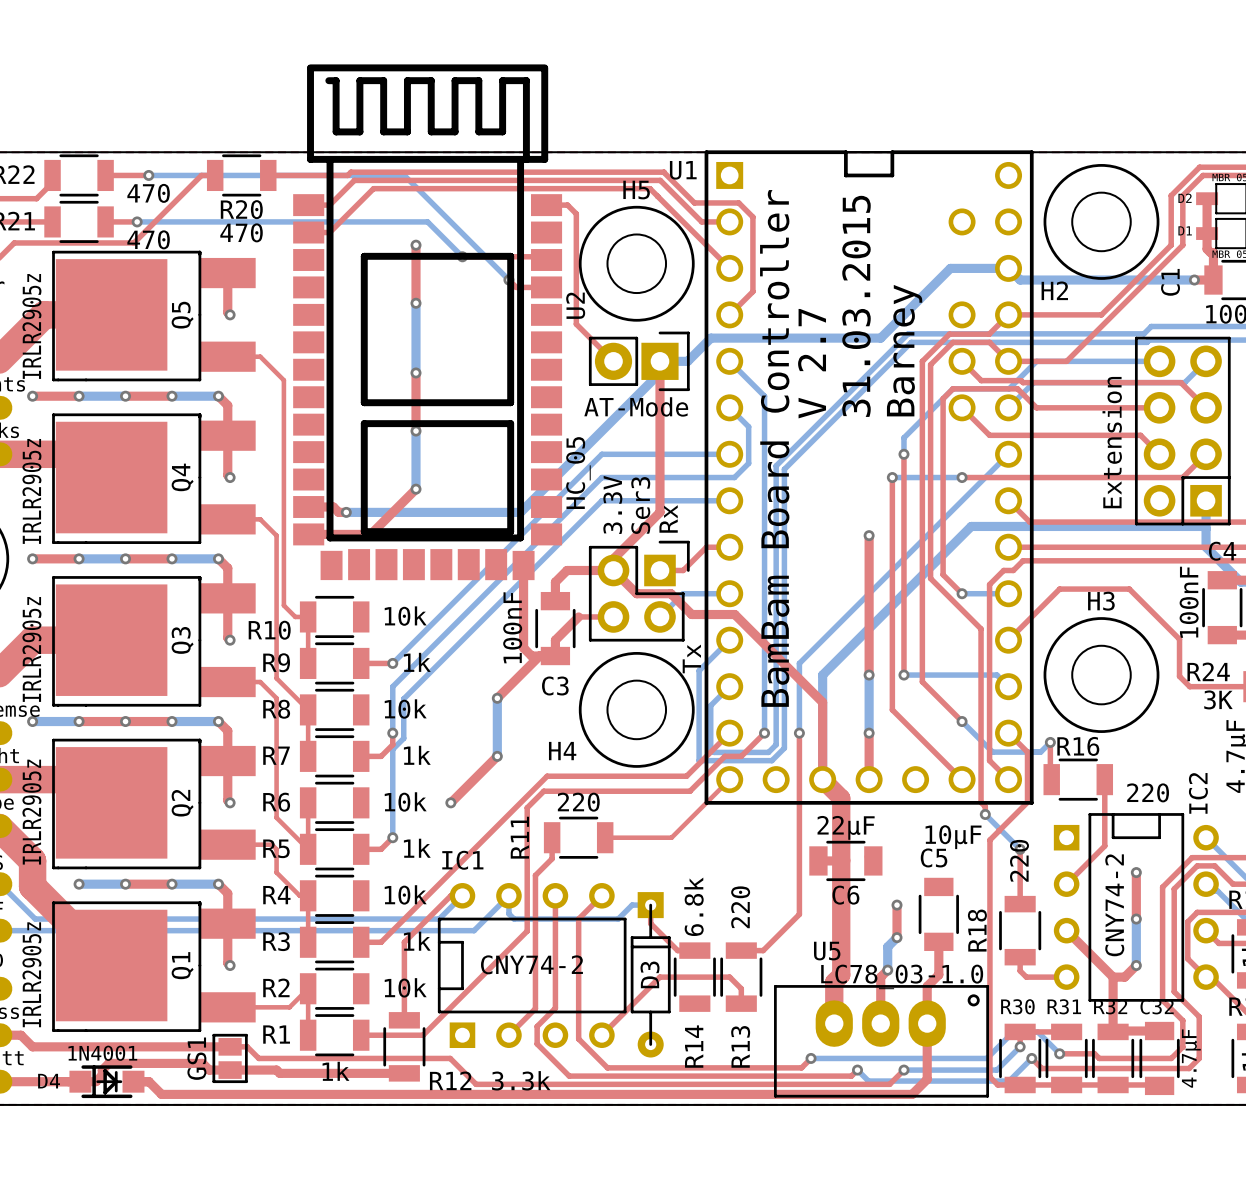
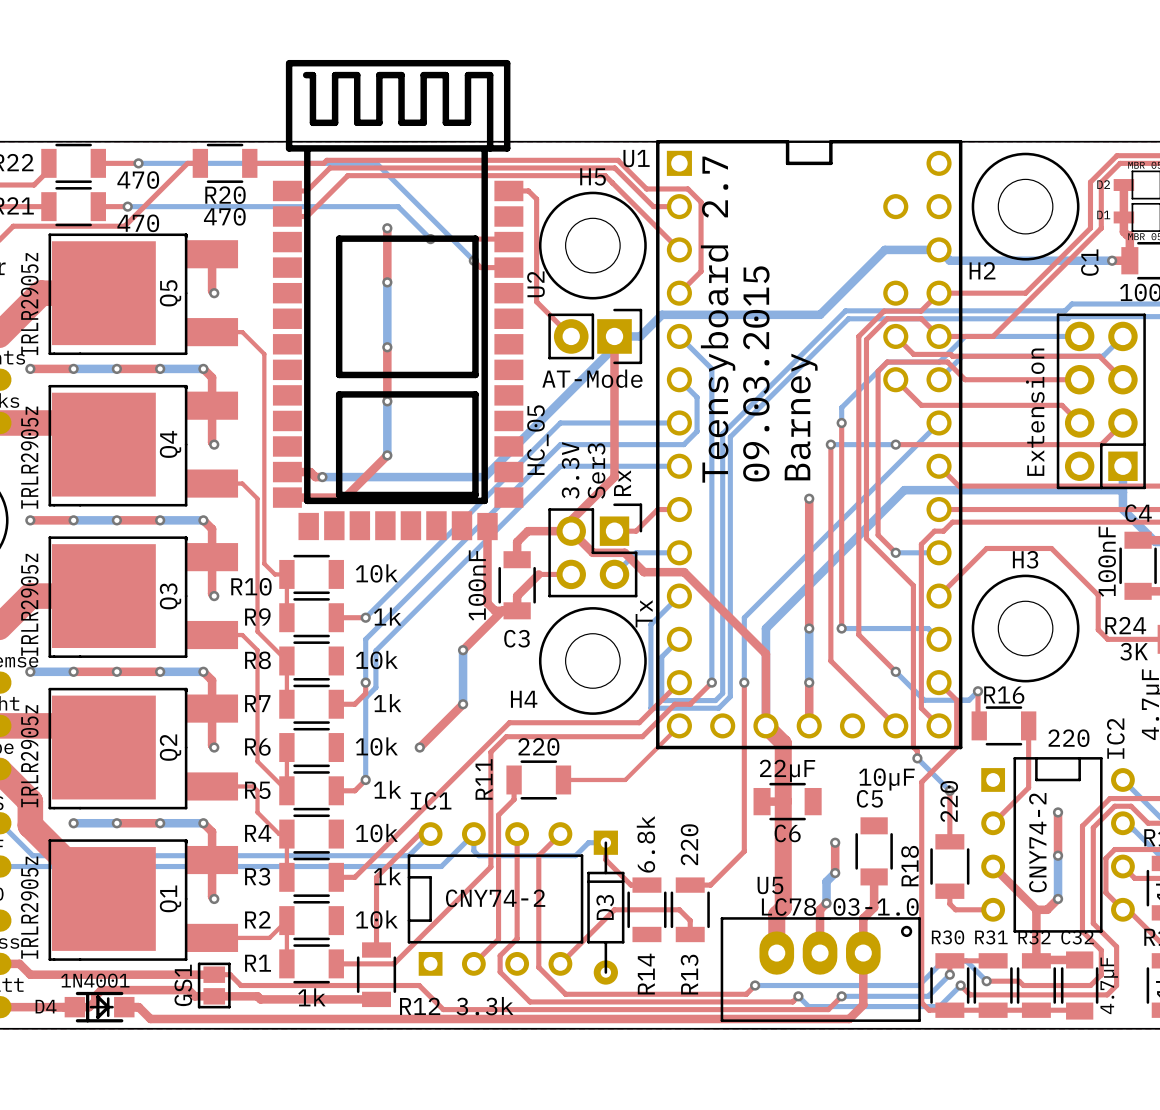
text: 31.03.2015 (856, 306) -> 09.03.2015 (756, 373)
text: none -> Teensyboard 2.7 (718, 319)
text position: Barney (904, 350) -> Barney (801, 417)
text: V 2.7 (812, 363) -> none
text: BamBam Board Controller (774, 448) -> none

